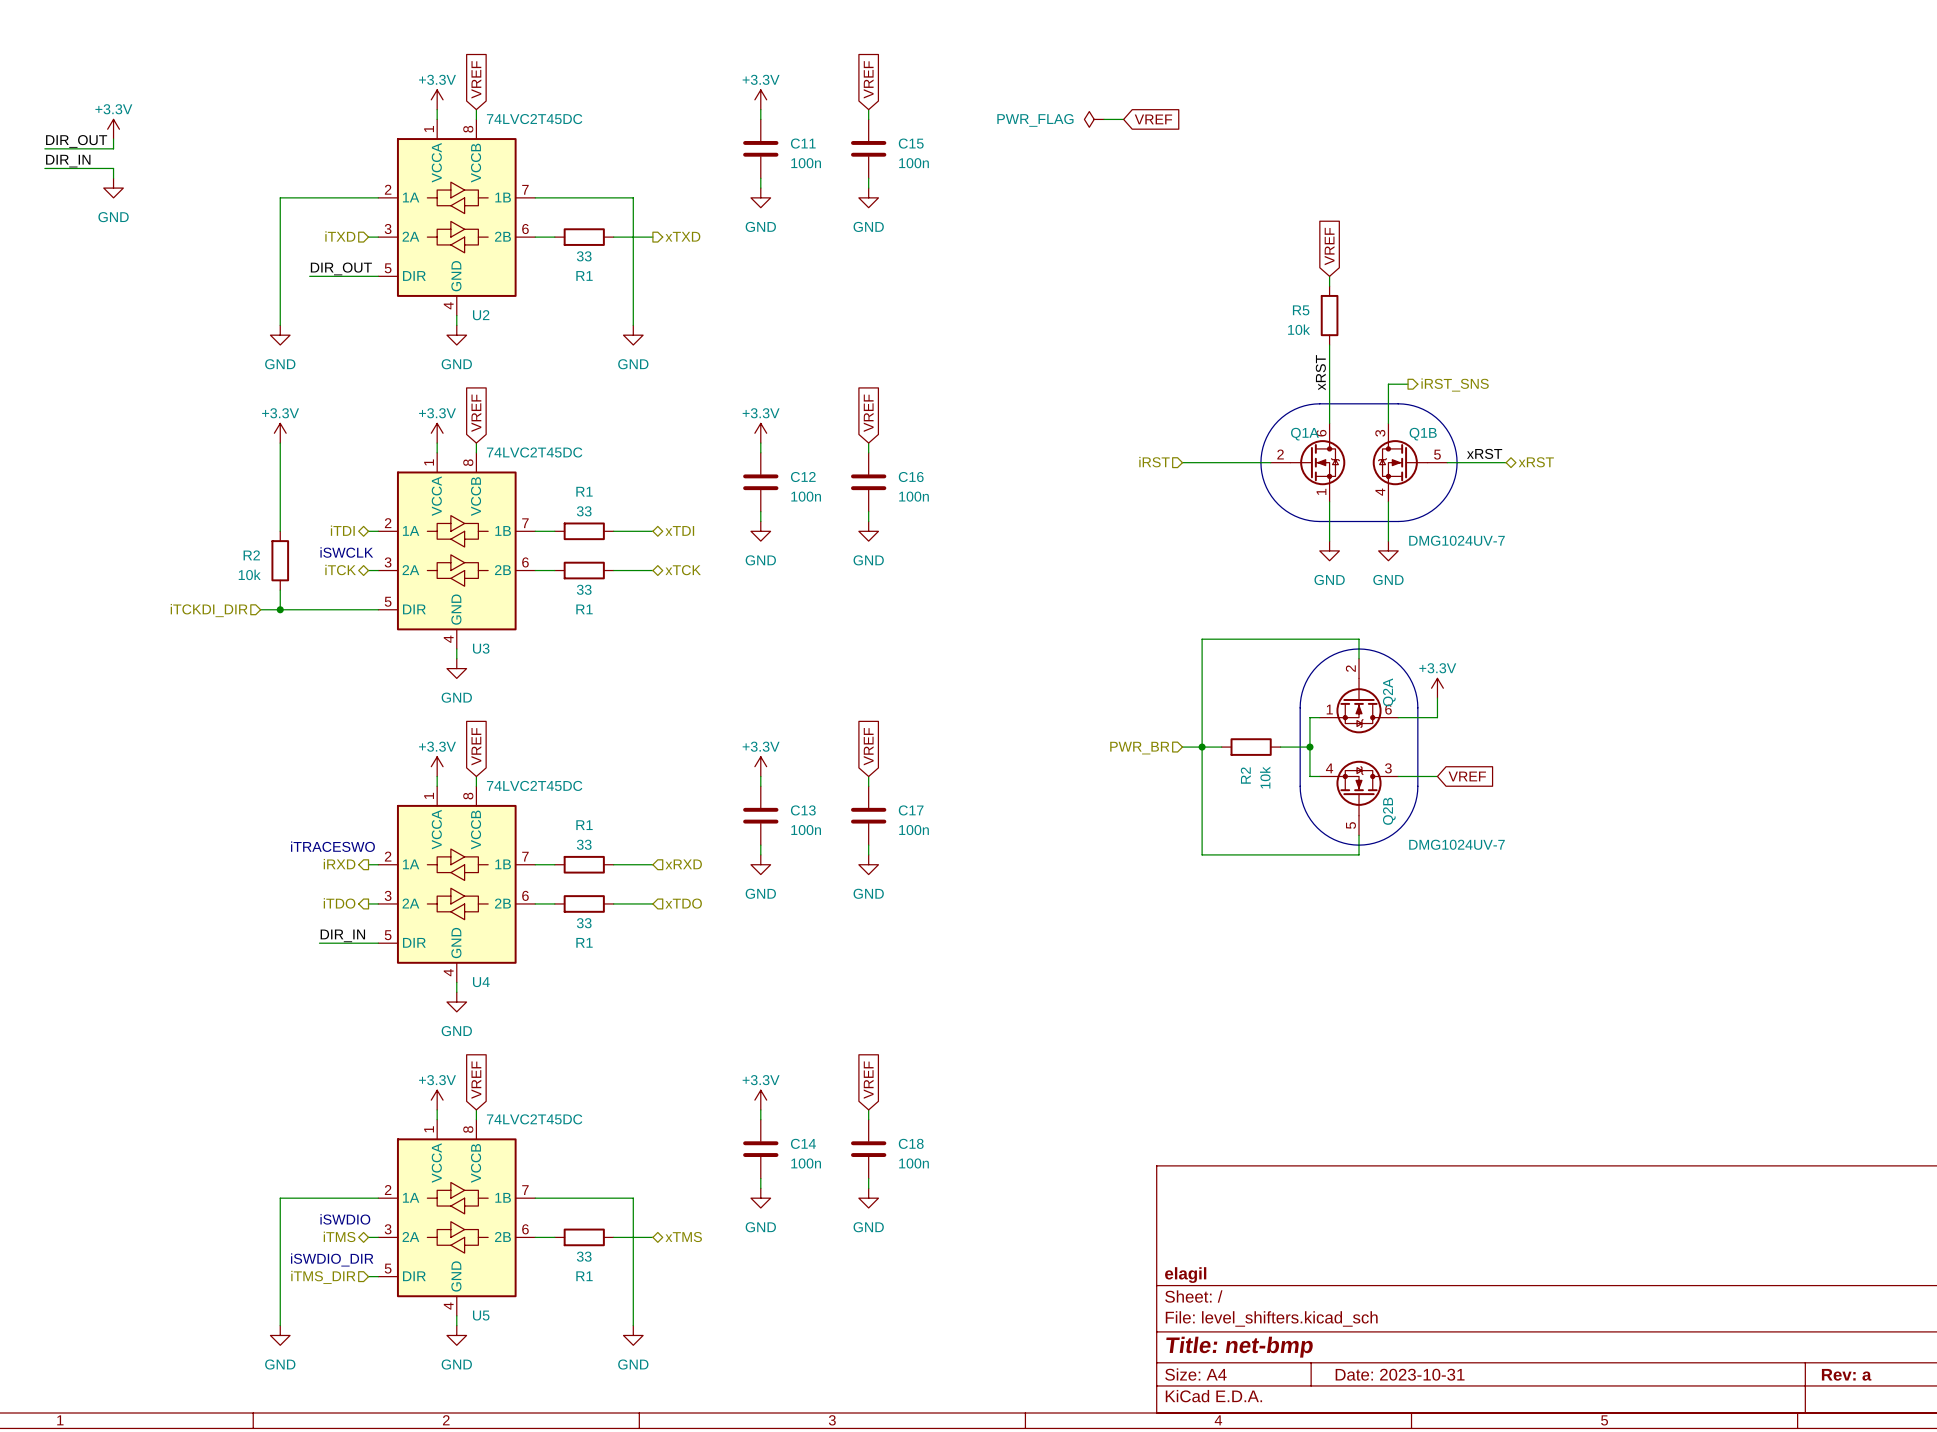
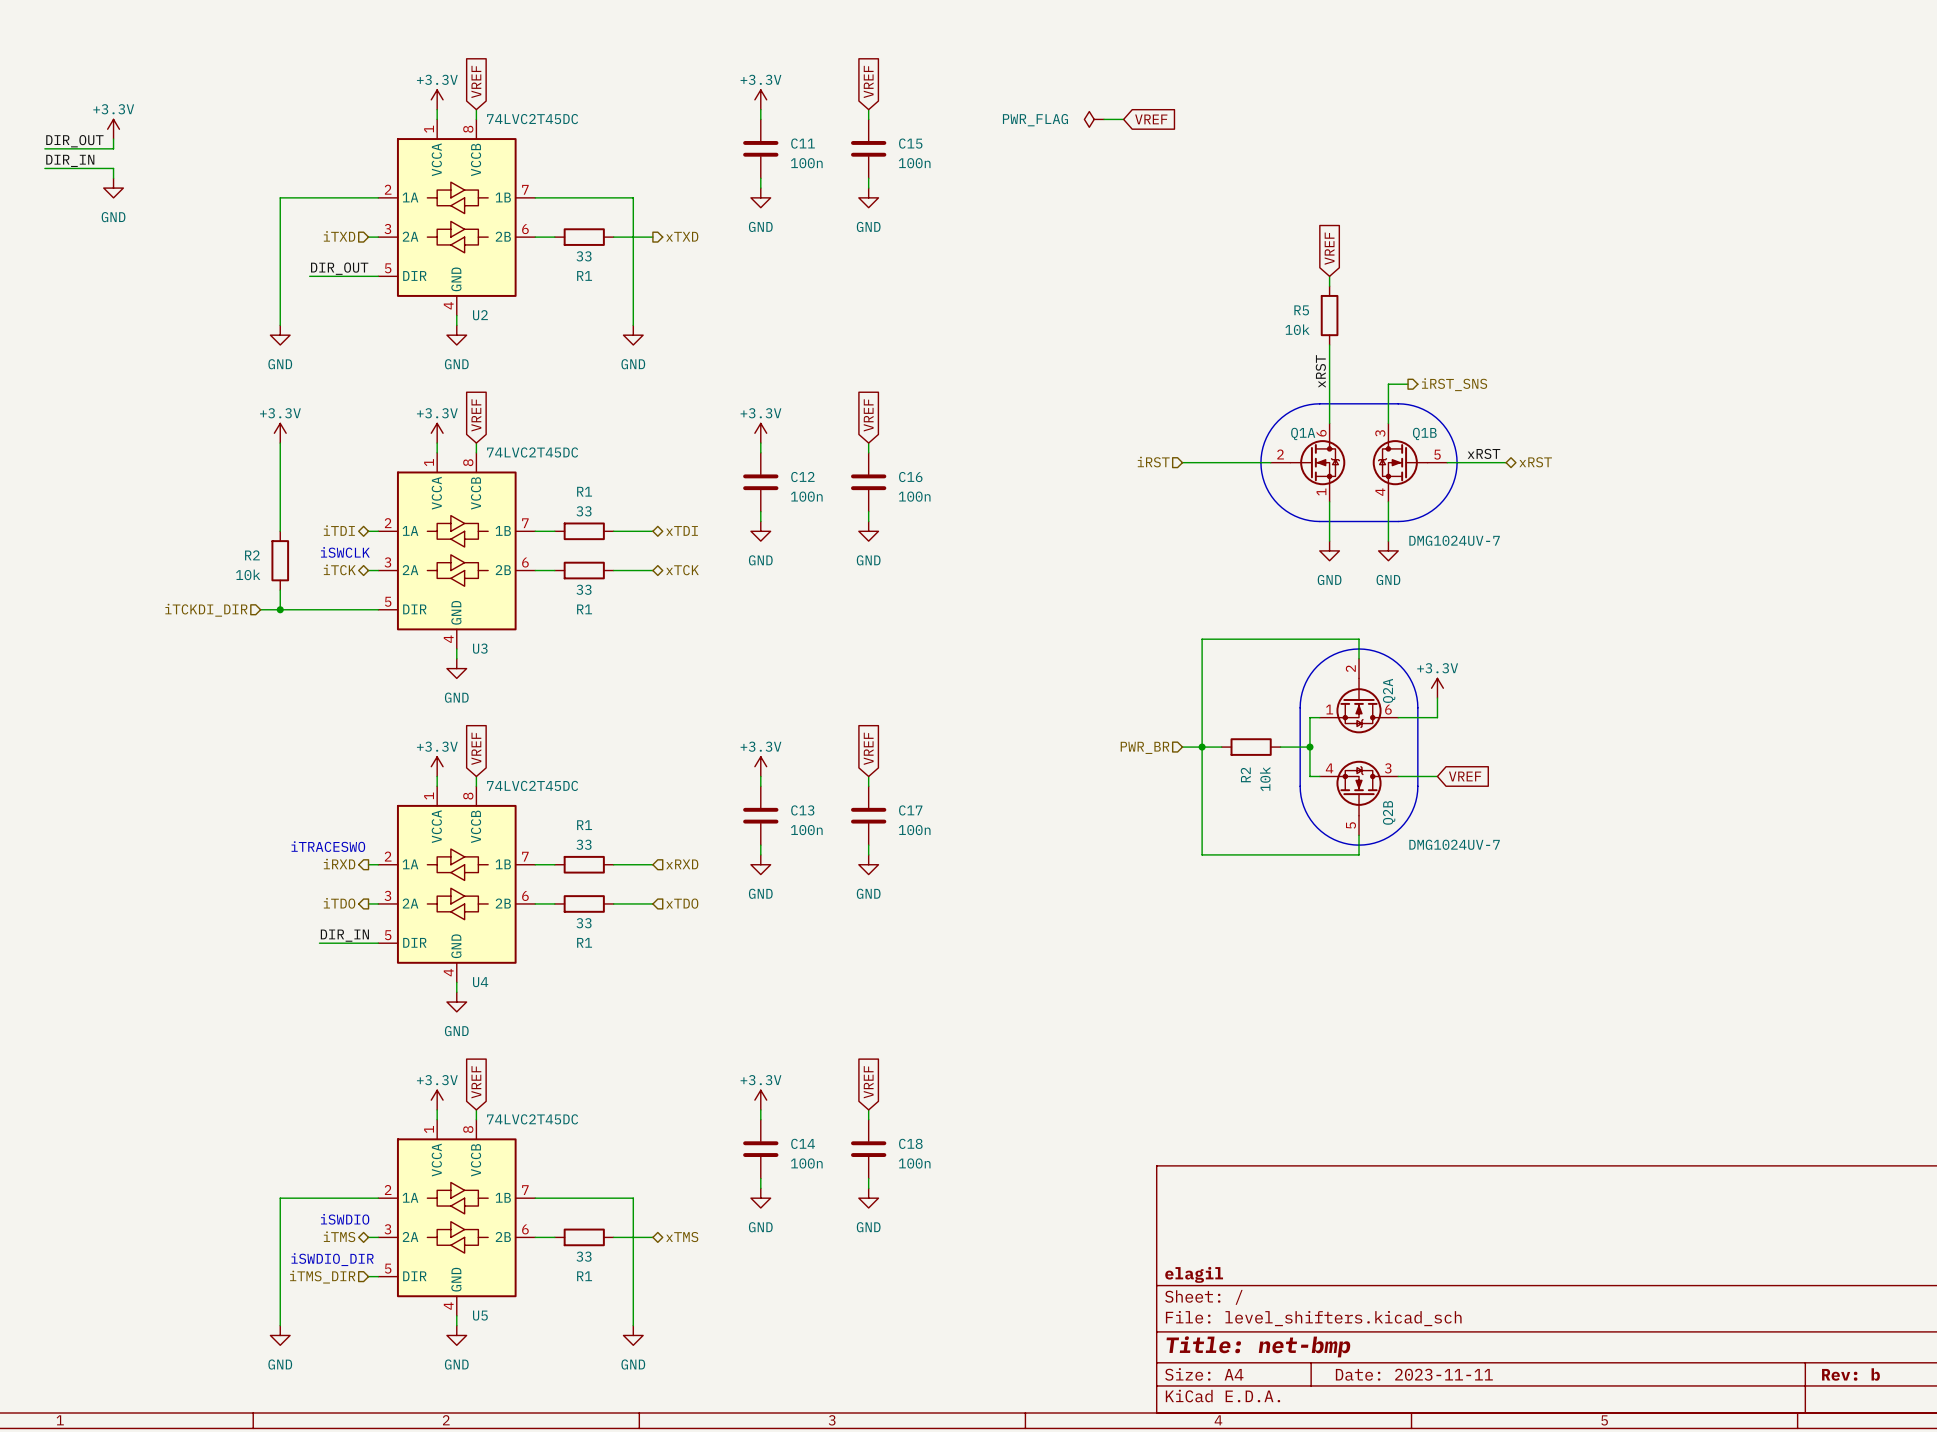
title block: Date: 2023-10-31 (1400, 1374) -> Date: 2023-11-11 (1414, 1374)
title block: Rev: a (1846, 1374) -> Rev: b (1850, 1374)

